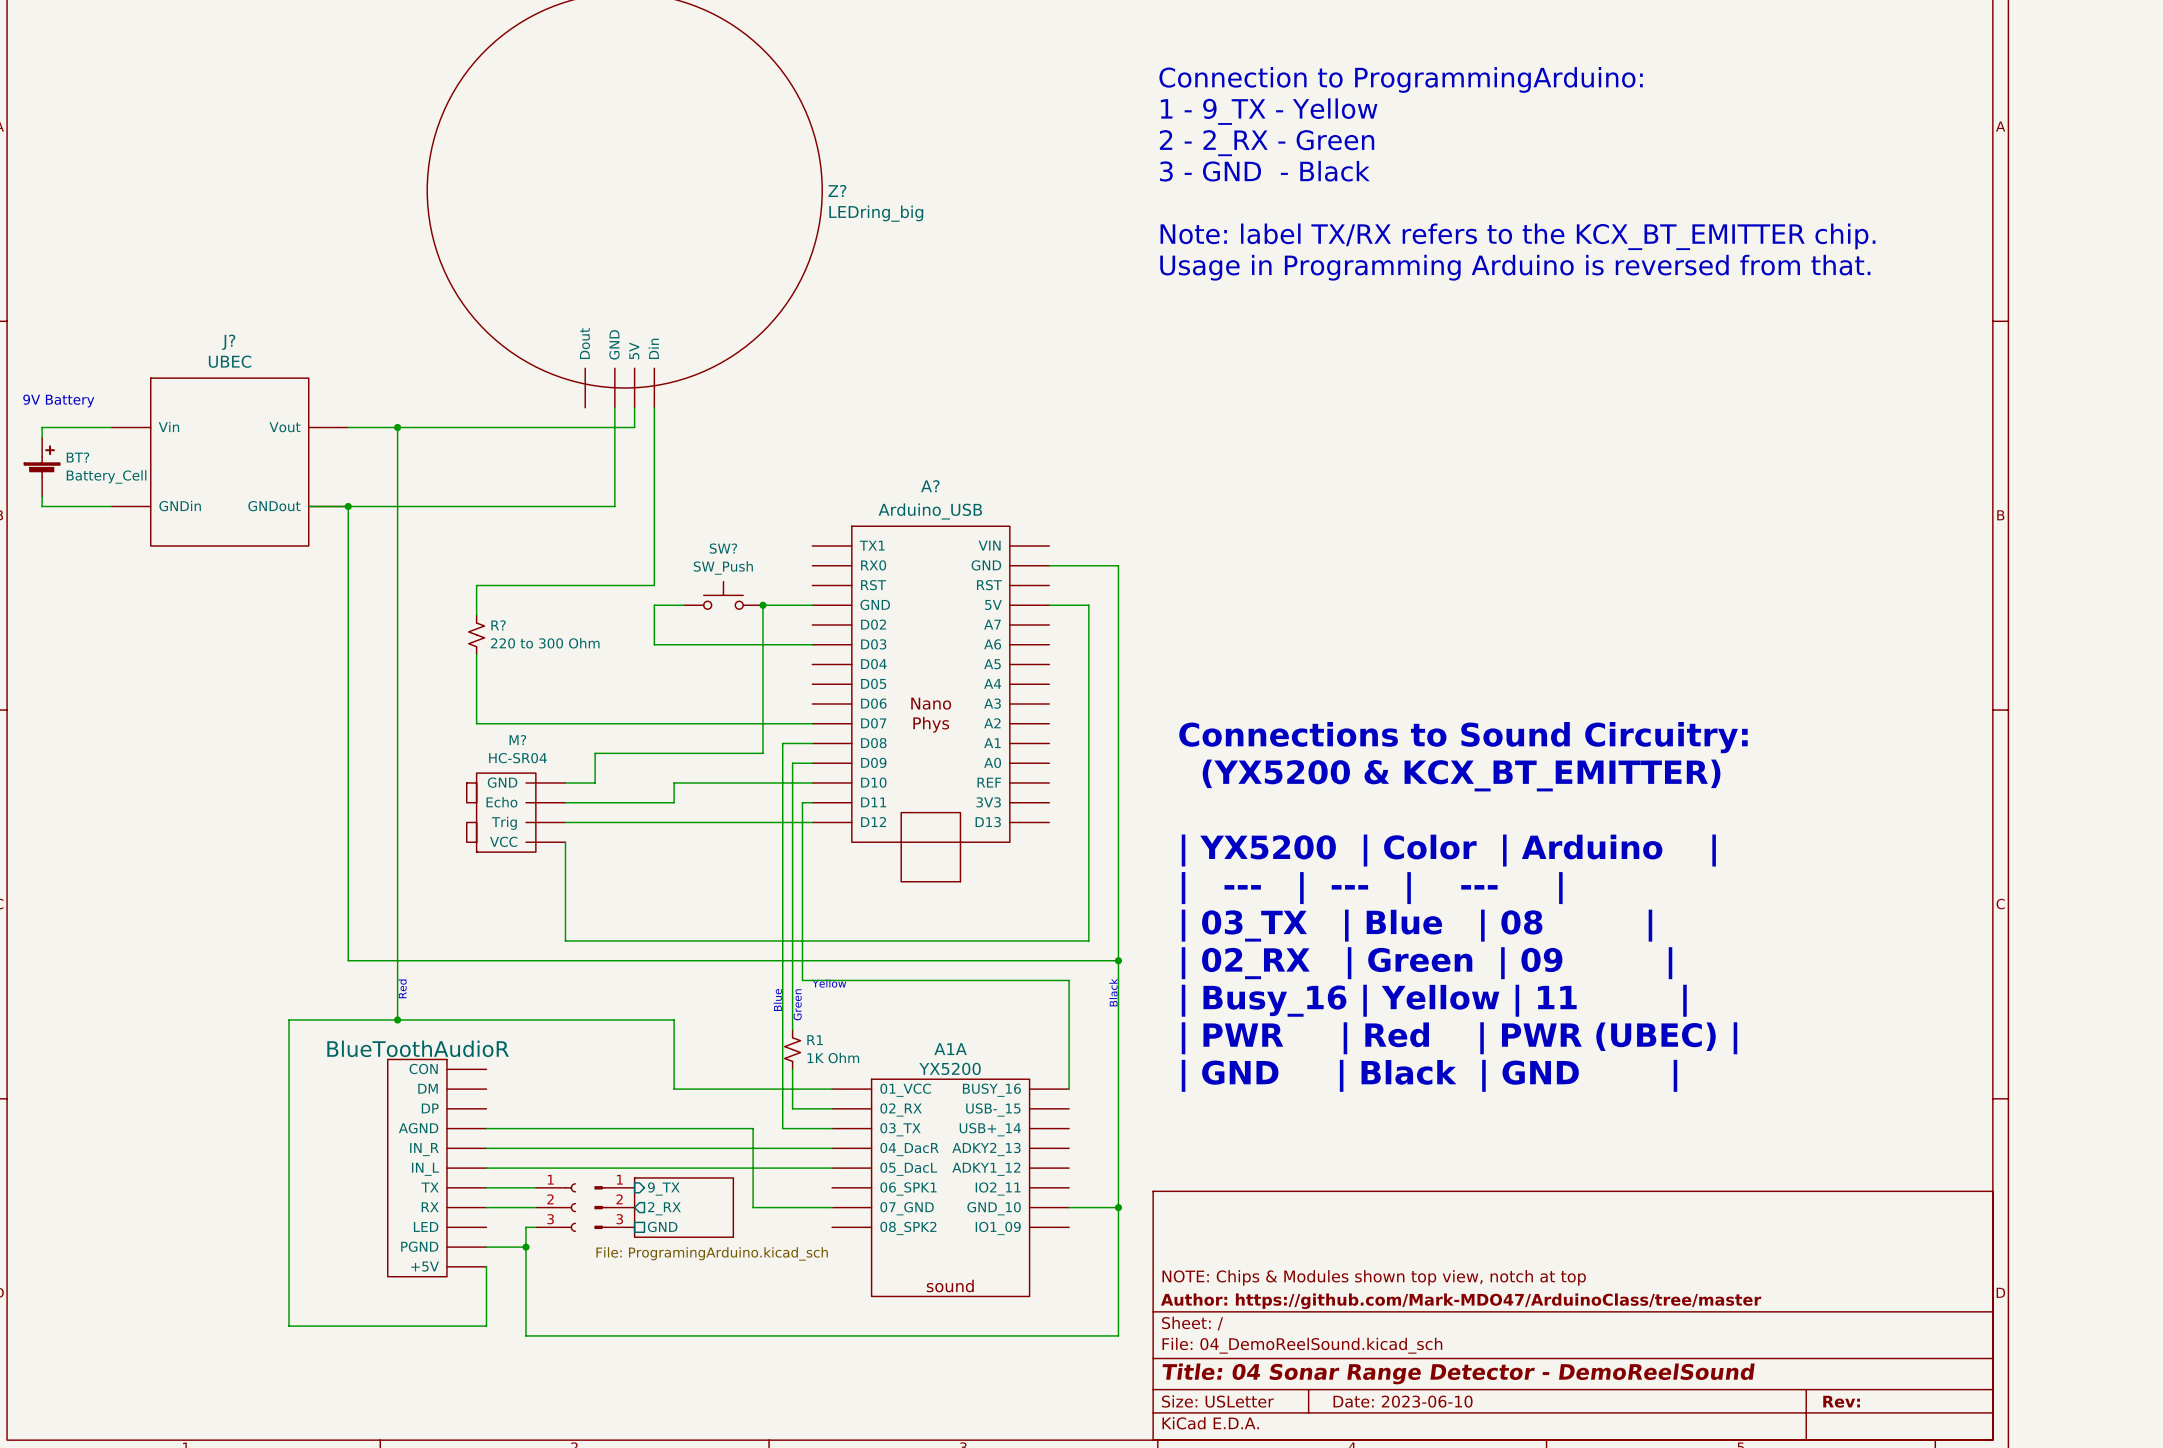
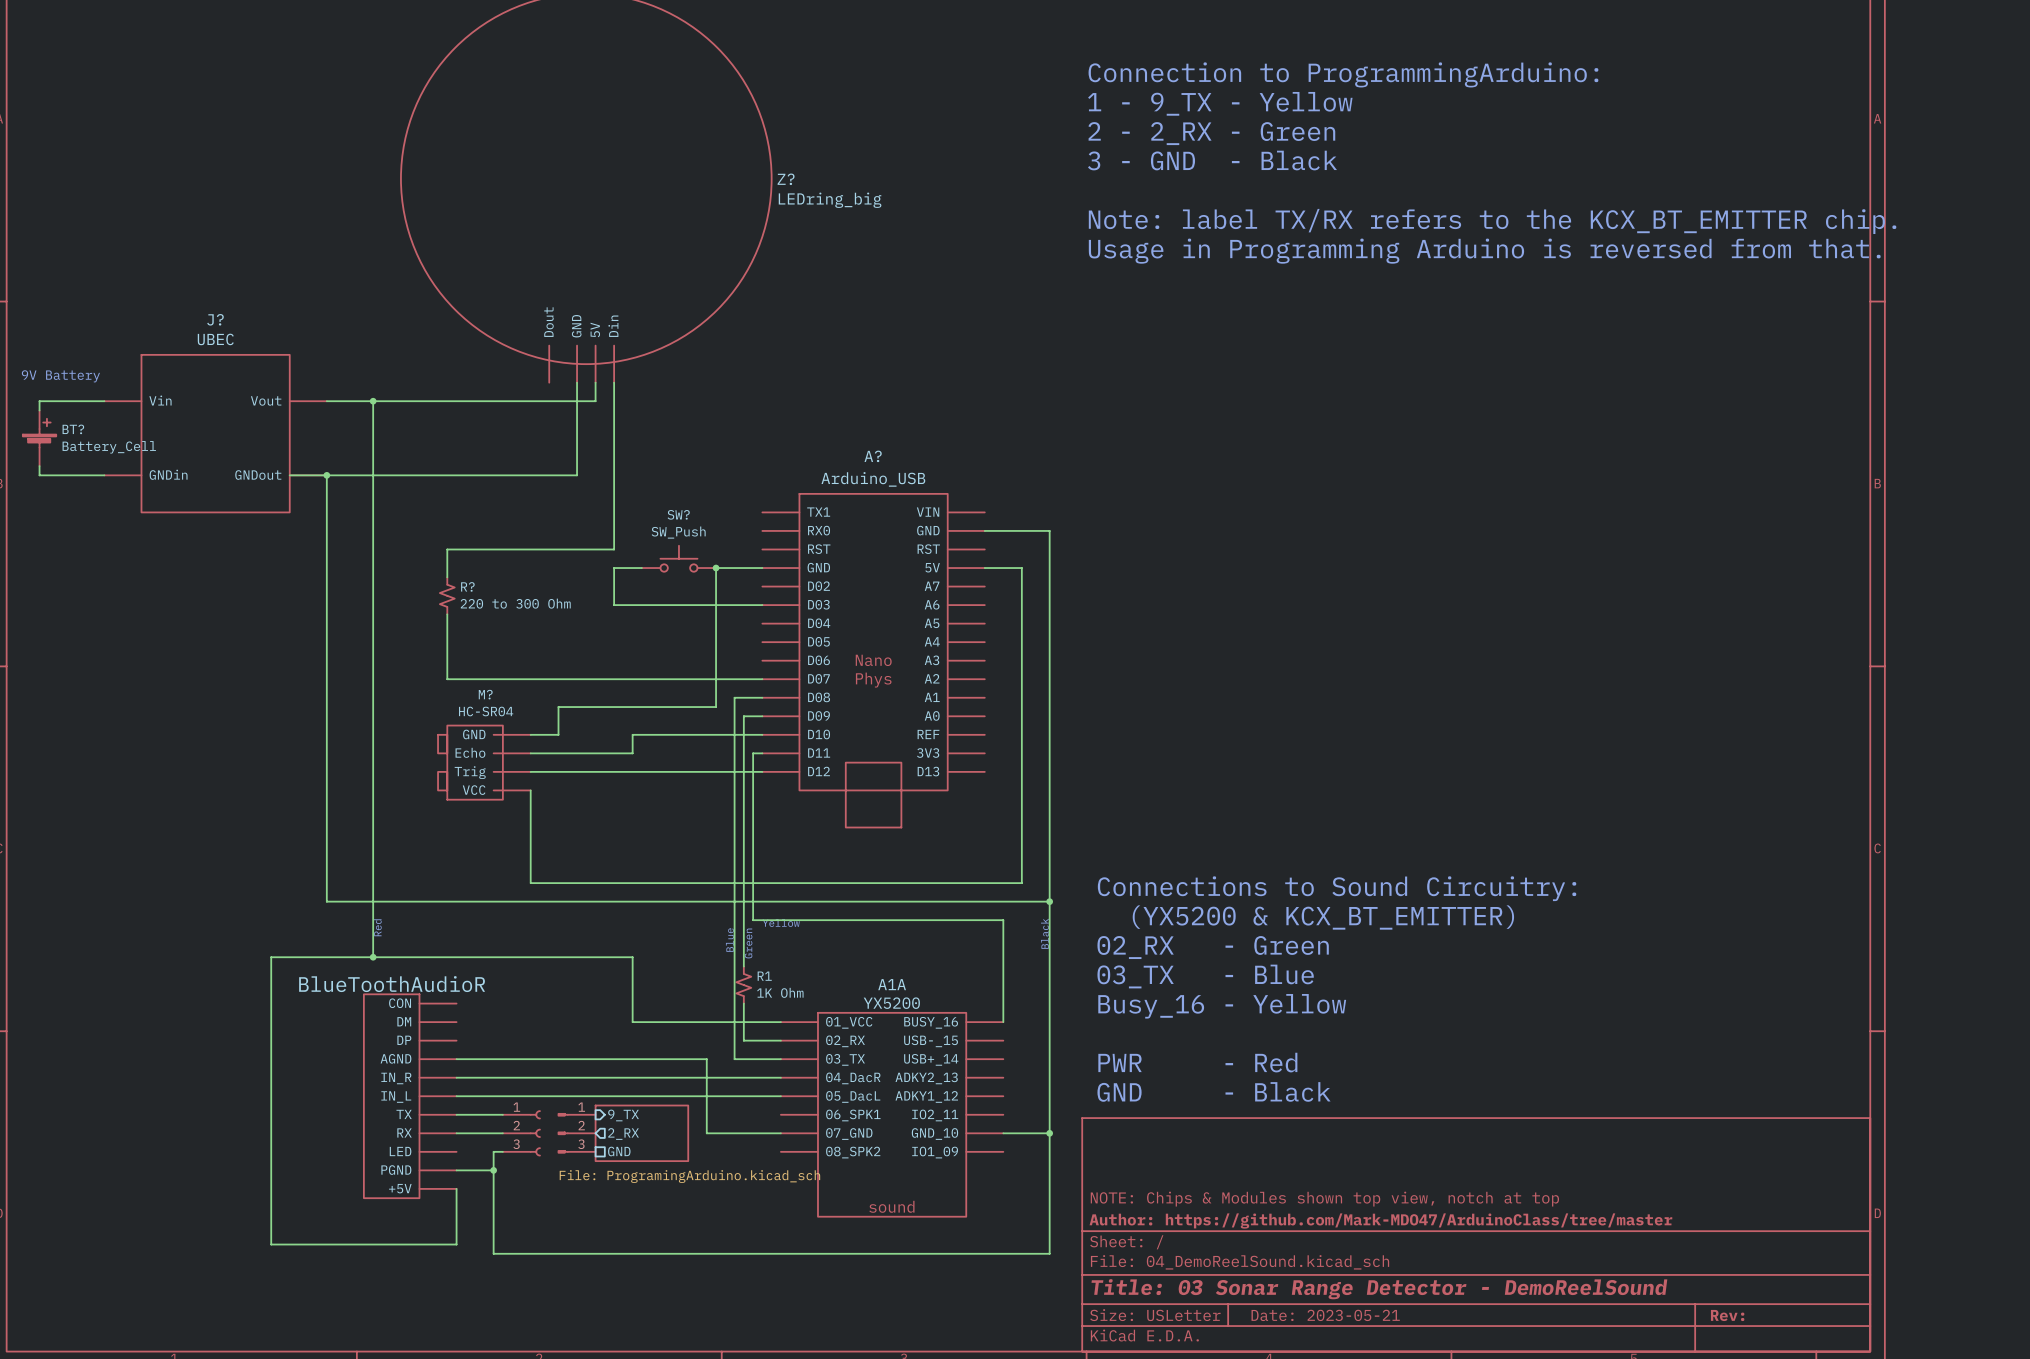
text: Connections to Sound Circuitry: (1463, 737) -> none
text: (YX5200 & KCX_BT_EMITTER) (1461, 775) -> none
text: | YX5200 | Color | Arduino | (1448, 850) -> none
text: | --- | --- | --- | (1372, 888) -> none
text: | 03_TX | Blue | 08 | (1416, 925) -> none
text: none -> Connections to Sound Circuitry: (1337, 888)
text: | 02_RX | Green | 09 | (1427, 963) -> none
text: none -> (YX5200 & KCX_BT_EMITTER) (1323, 917)
text: | Busy_16 | Yellow | 11 | (1434, 1000) -> none
text: none -> 02_RX - Green (1213, 947)
text: | PWR | Red | PWR (UBEC) | (1459, 1038) -> none
text: none -> 03_TX - Blue (1205, 976)
text: none -> Busy_16 - Yellow (1222, 1006)
text: | GND | Black | GND | (1429, 1075) -> none
text: none -> PWR - Red (1197, 1062)
text: none -> GND - Black (1214, 1091)
title block: Title: 04 Sonar Range Detector - DemoReelSound (1458, 1373) -> Title: 03 Sonar Range Detector - DemoReelSound (1379, 1289)
title block: Date: 2023-06-10 (1403, 1401) -> Date: 2023-05-21 (1325, 1315)

